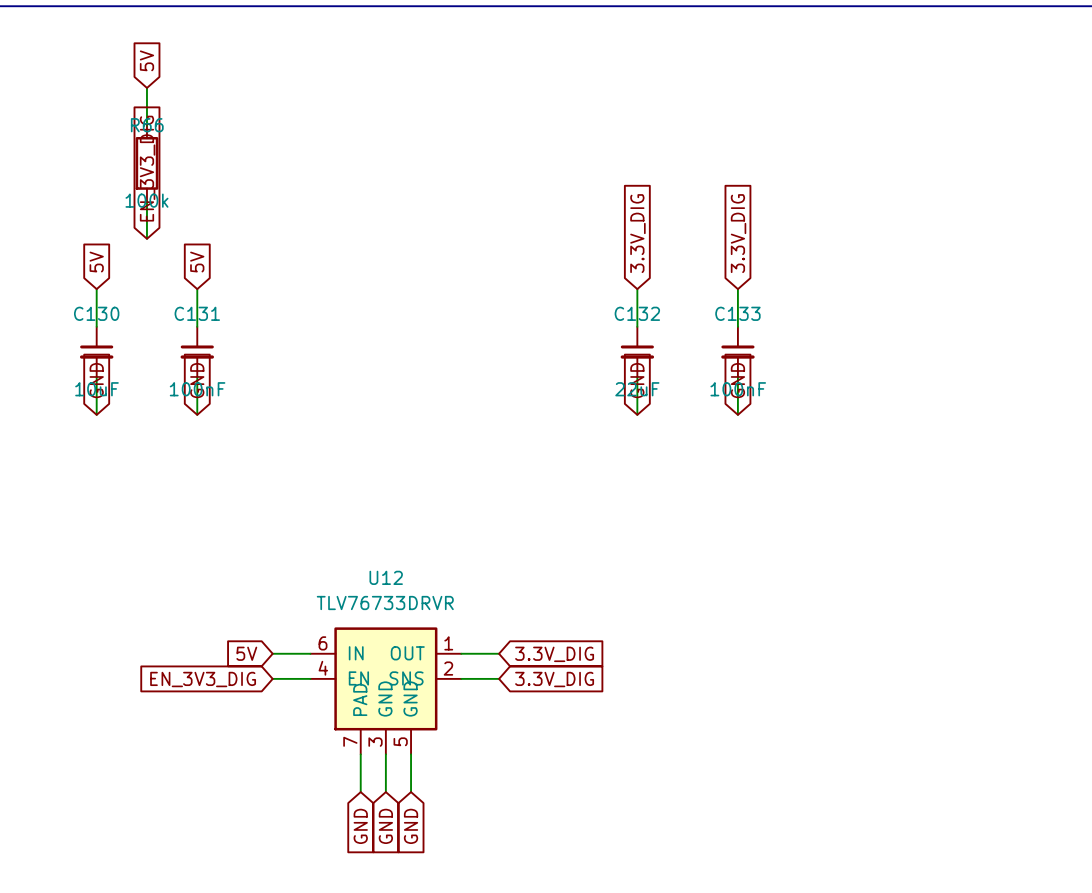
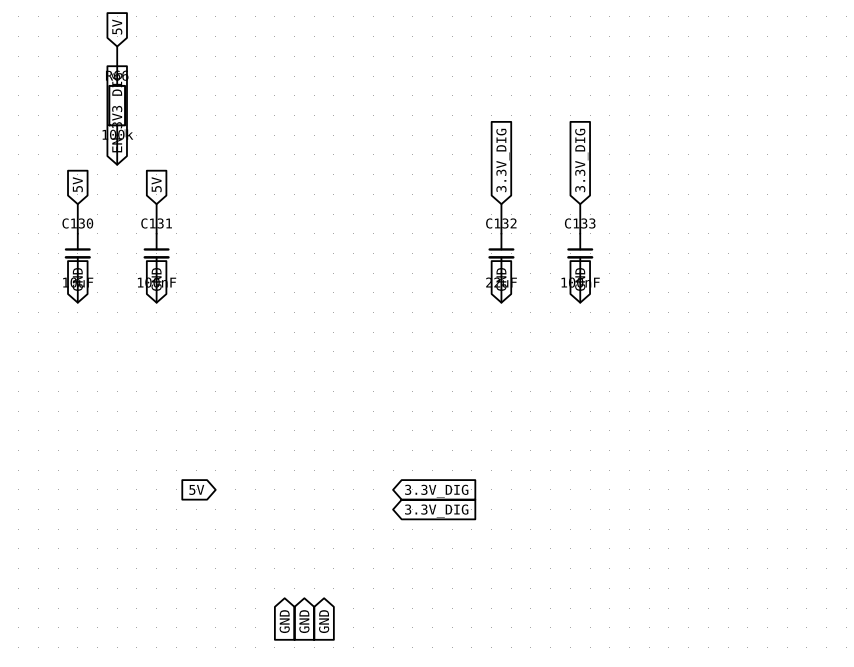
wire: (272, 653) (310, 653) -> none
wire: (461, 653) (499, 653) -> none
wire: (272, 678) (310, 678) -> none
wire: (461, 678) (499, 678) -> none
global label: EN_3V3_DIG (203, 679) -> none
U12: TLV76733DRVR (385, 690) -> none
wire: (360, 754) (360, 792) -> none
wire: (385, 754) (385, 792) -> none
wire: (411, 754) (411, 792) -> none

